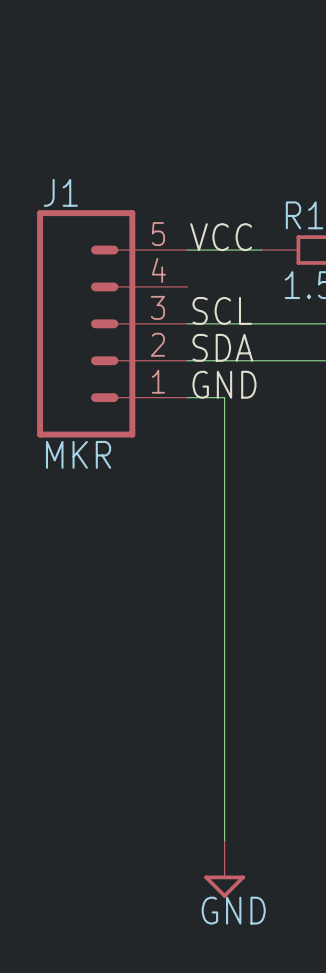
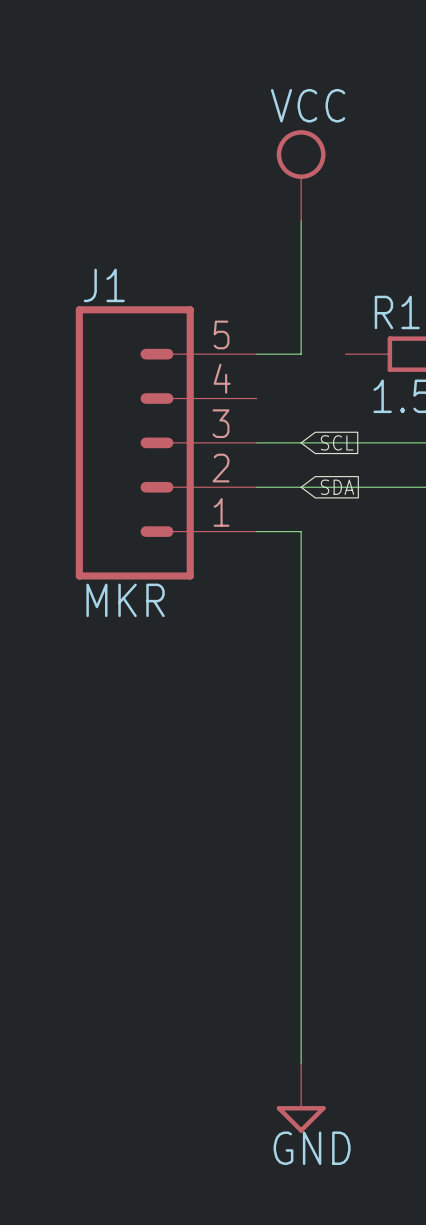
power symbol: none -> VCC (301, 175)
label: VCC (221, 237) -> none
wire: (224, 250) (261, 250) -> (301, 354) (301, 221)
label: SCL (222, 310) -> none
global label: none -> SCL (337, 442)
label: SDA (222, 347) -> none
global label: none -> SDA (337, 487)
label: GND (224, 384) -> none

